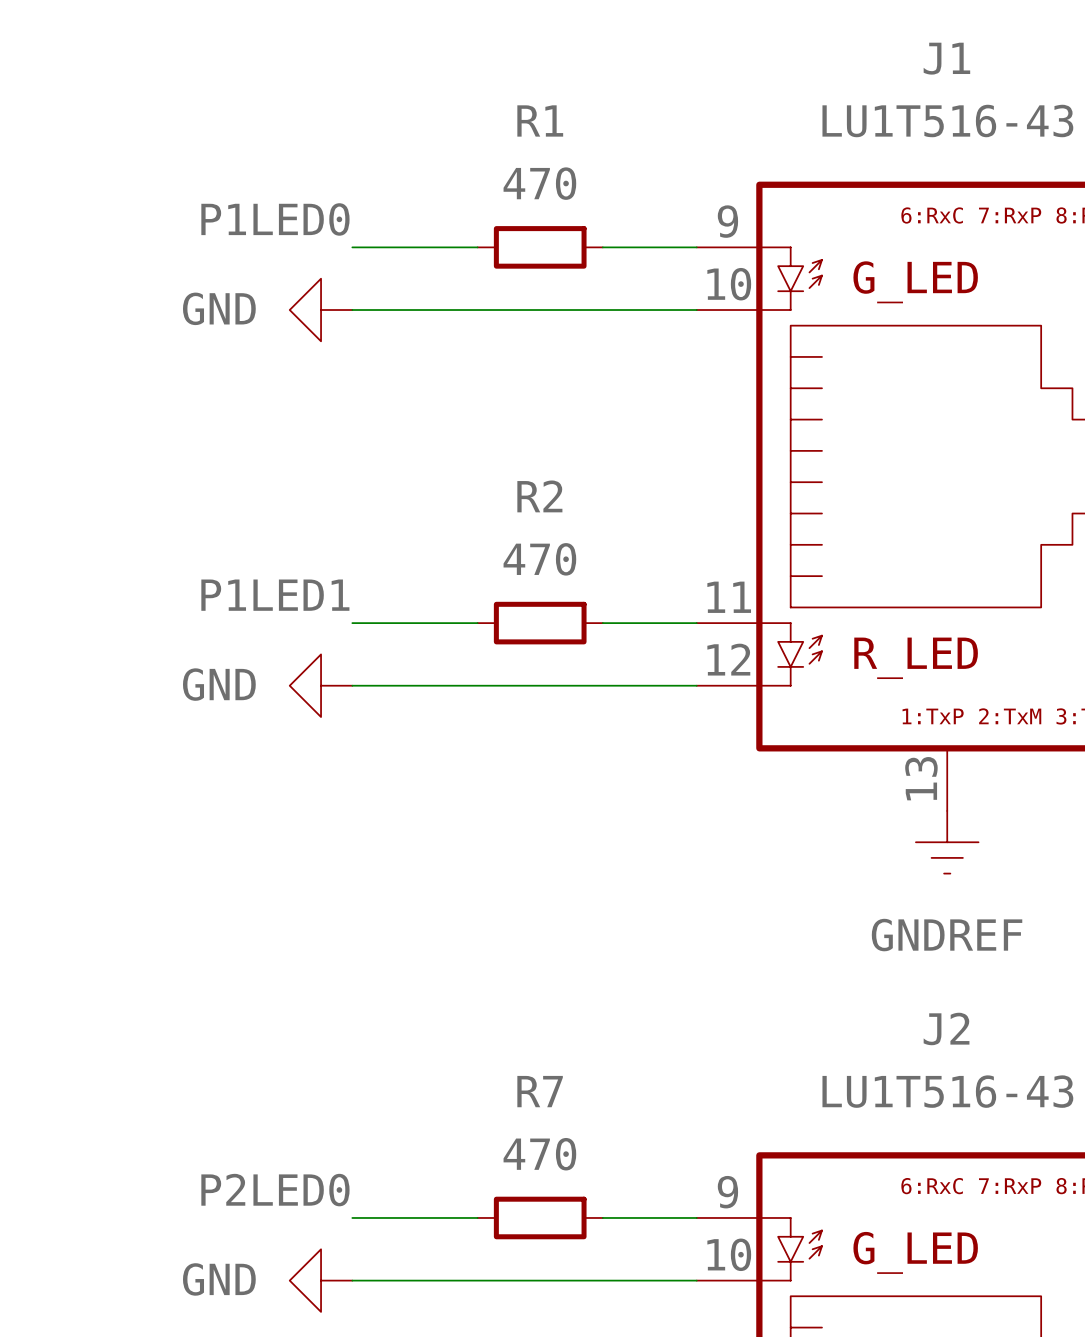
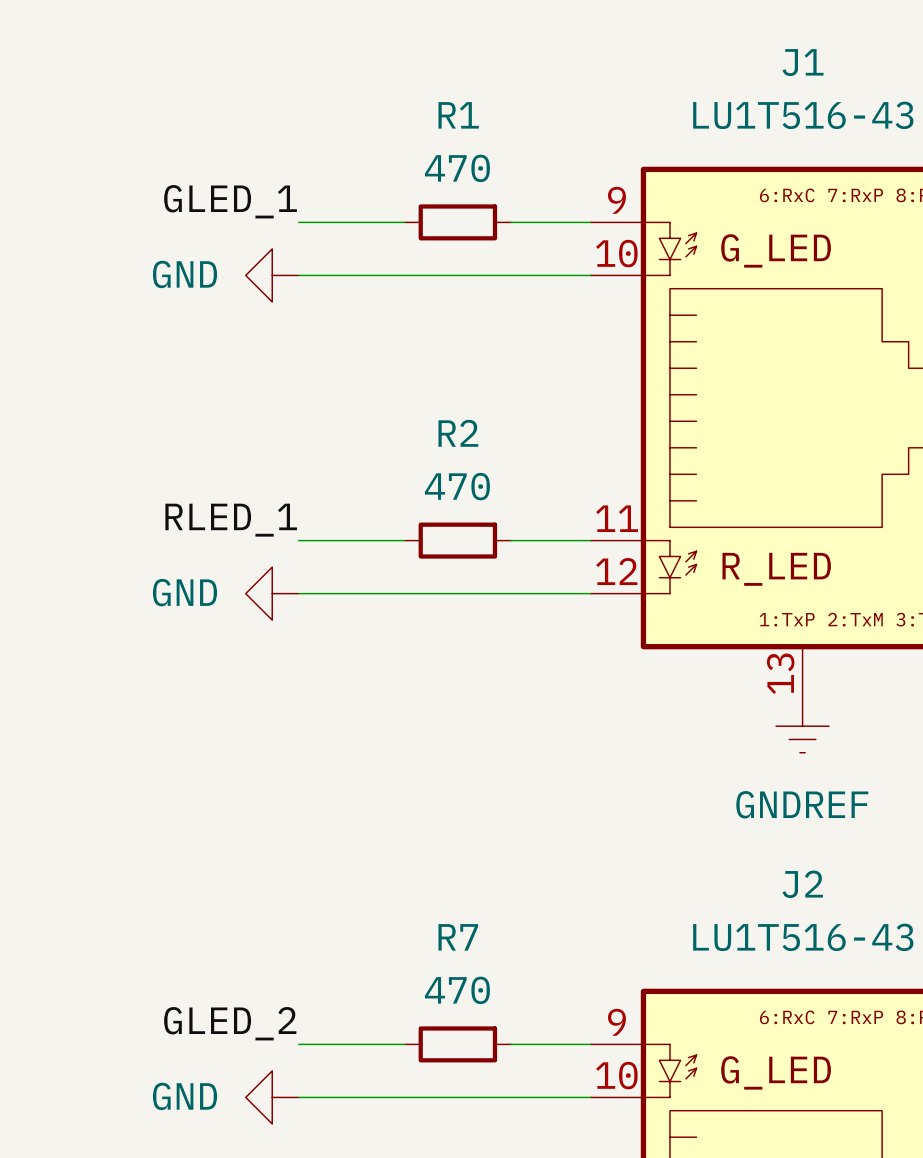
label: P1LED0 (275, 219) -> GLED_1 (230, 201)
label: P1LED1 (275, 595) -> RLED_1 (231, 520)
label: P2LED0 (275, 1190) -> GLED_2 (230, 1023)

